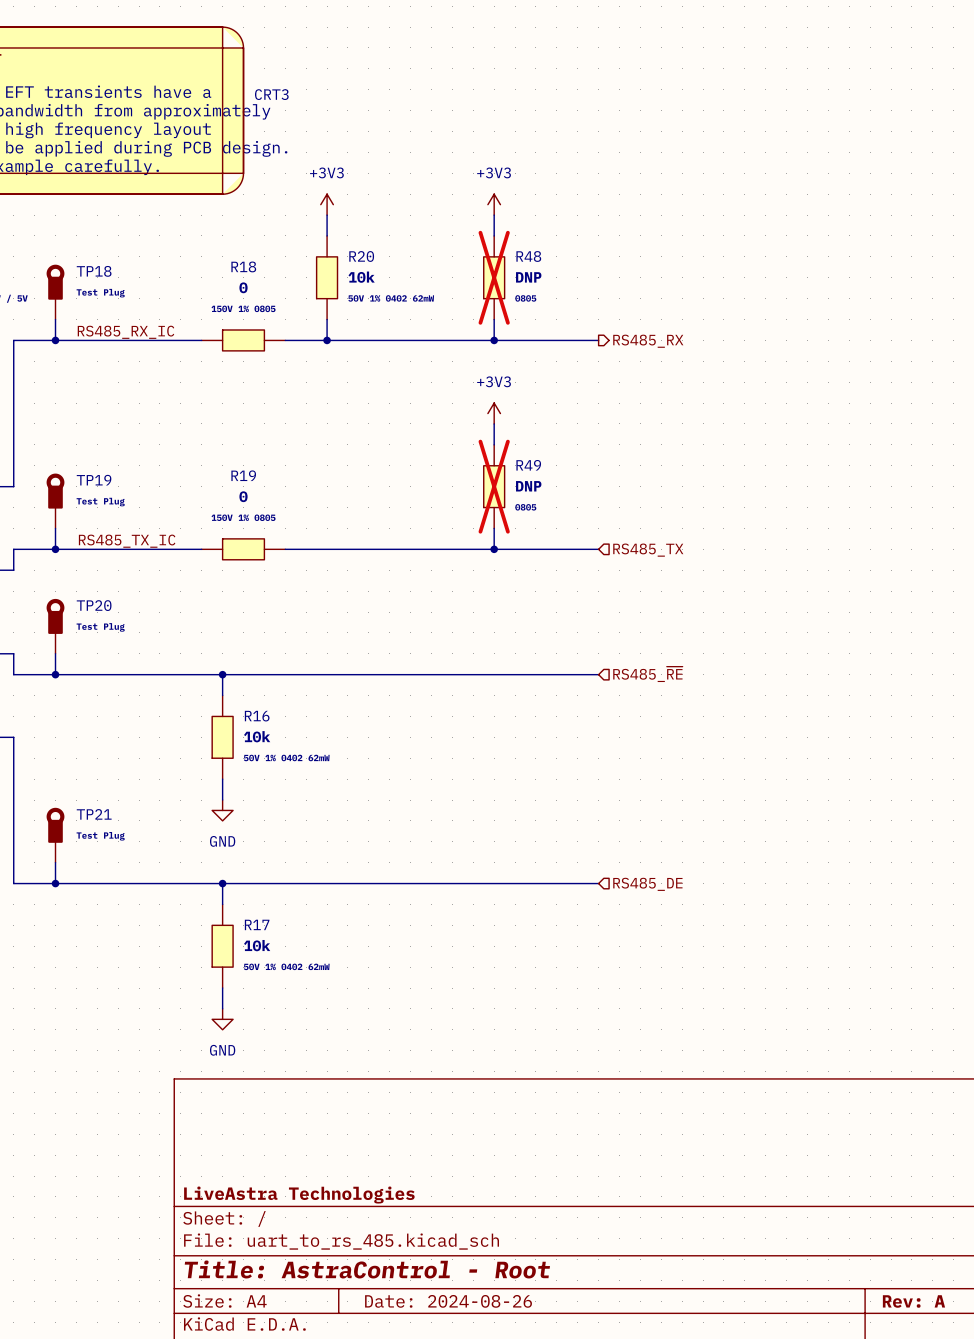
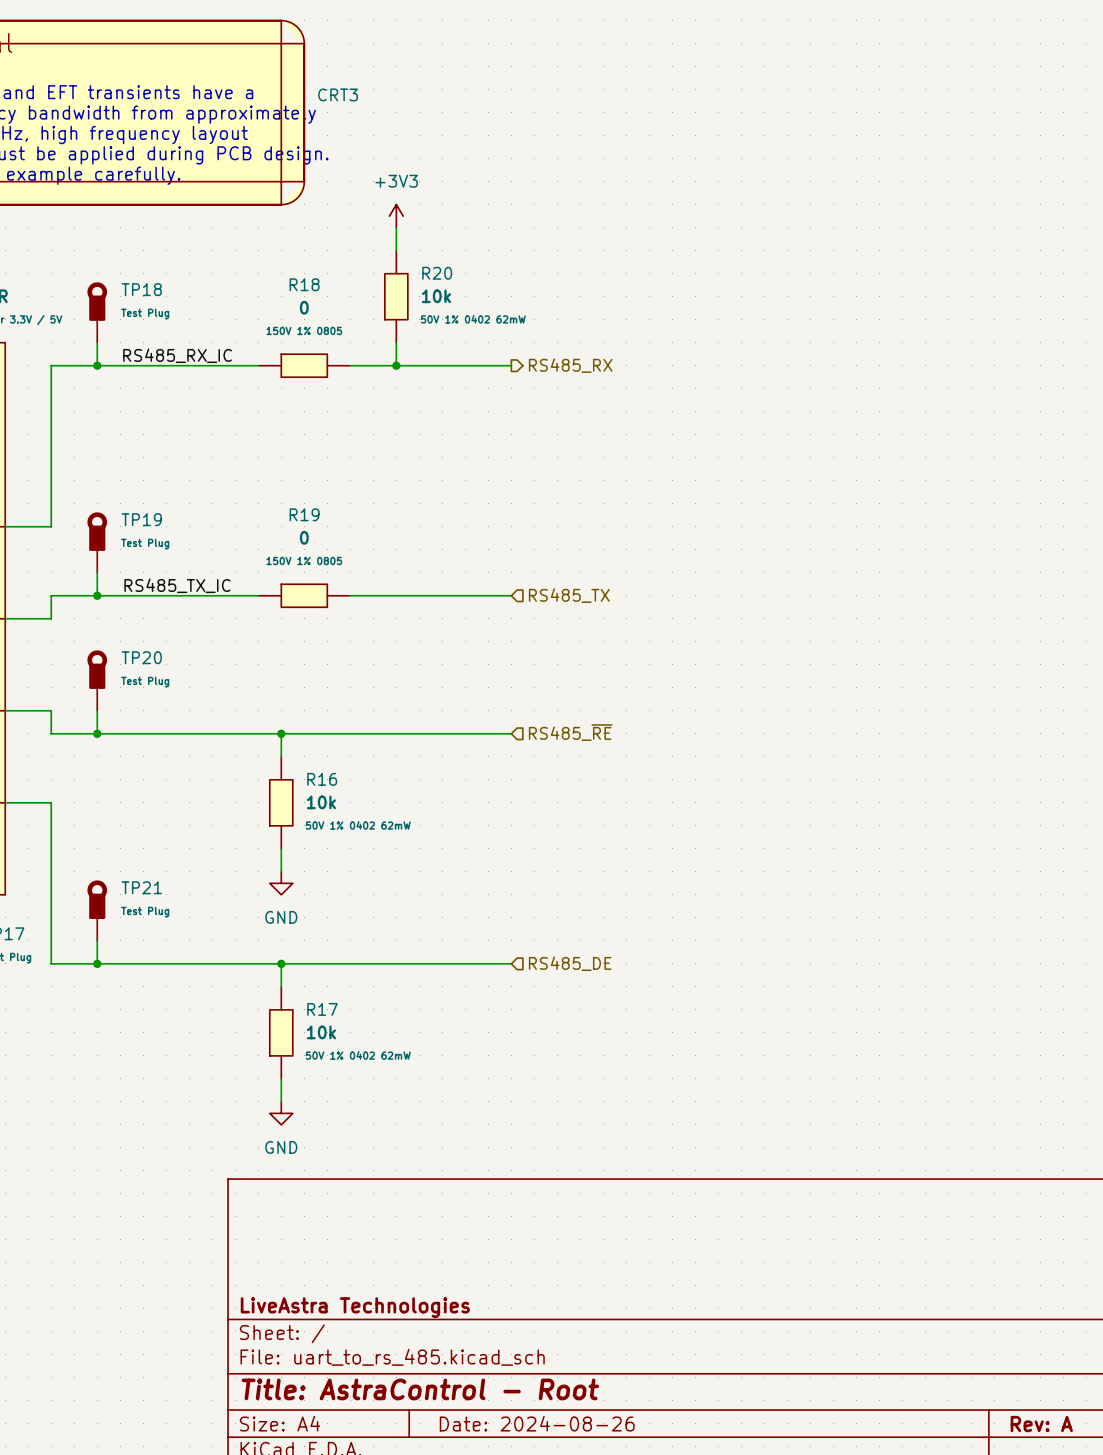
power symbol: +3V3 (494, 204) -> none
wire: (494, 215) (494, 235) -> none
R48: DNP (494, 277) -> none
wire: (494, 319) (494, 340) -> none
wire: (431, 340) (598, 340) -> none
junction: (494, 340) -> none
hierarchical label position: RS485_RX (648, 341) -> RS485_RX (570, 365)
power symbol: +3V3 (494, 413) -> none
wire: (494, 423) (494, 444) -> none
R49: DNP (494, 486) -> none
wire: (494, 528) (494, 549) -> none
wire: (431, 549) (598, 549) -> none
junction: (494, 549) -> none
hierarchical label position: RS485_TX (648, 550) -> RS485_TX (569, 595)
wire: (431, 674) (598, 674) -> none
hierarchical label position: RS485_~{RE} (647, 674) -> RS485_~{RE} (570, 732)
wire: (431, 883) (598, 883) -> none
hierarchical label position: RS485_DE (647, 884) -> RS485_DE (570, 963)

